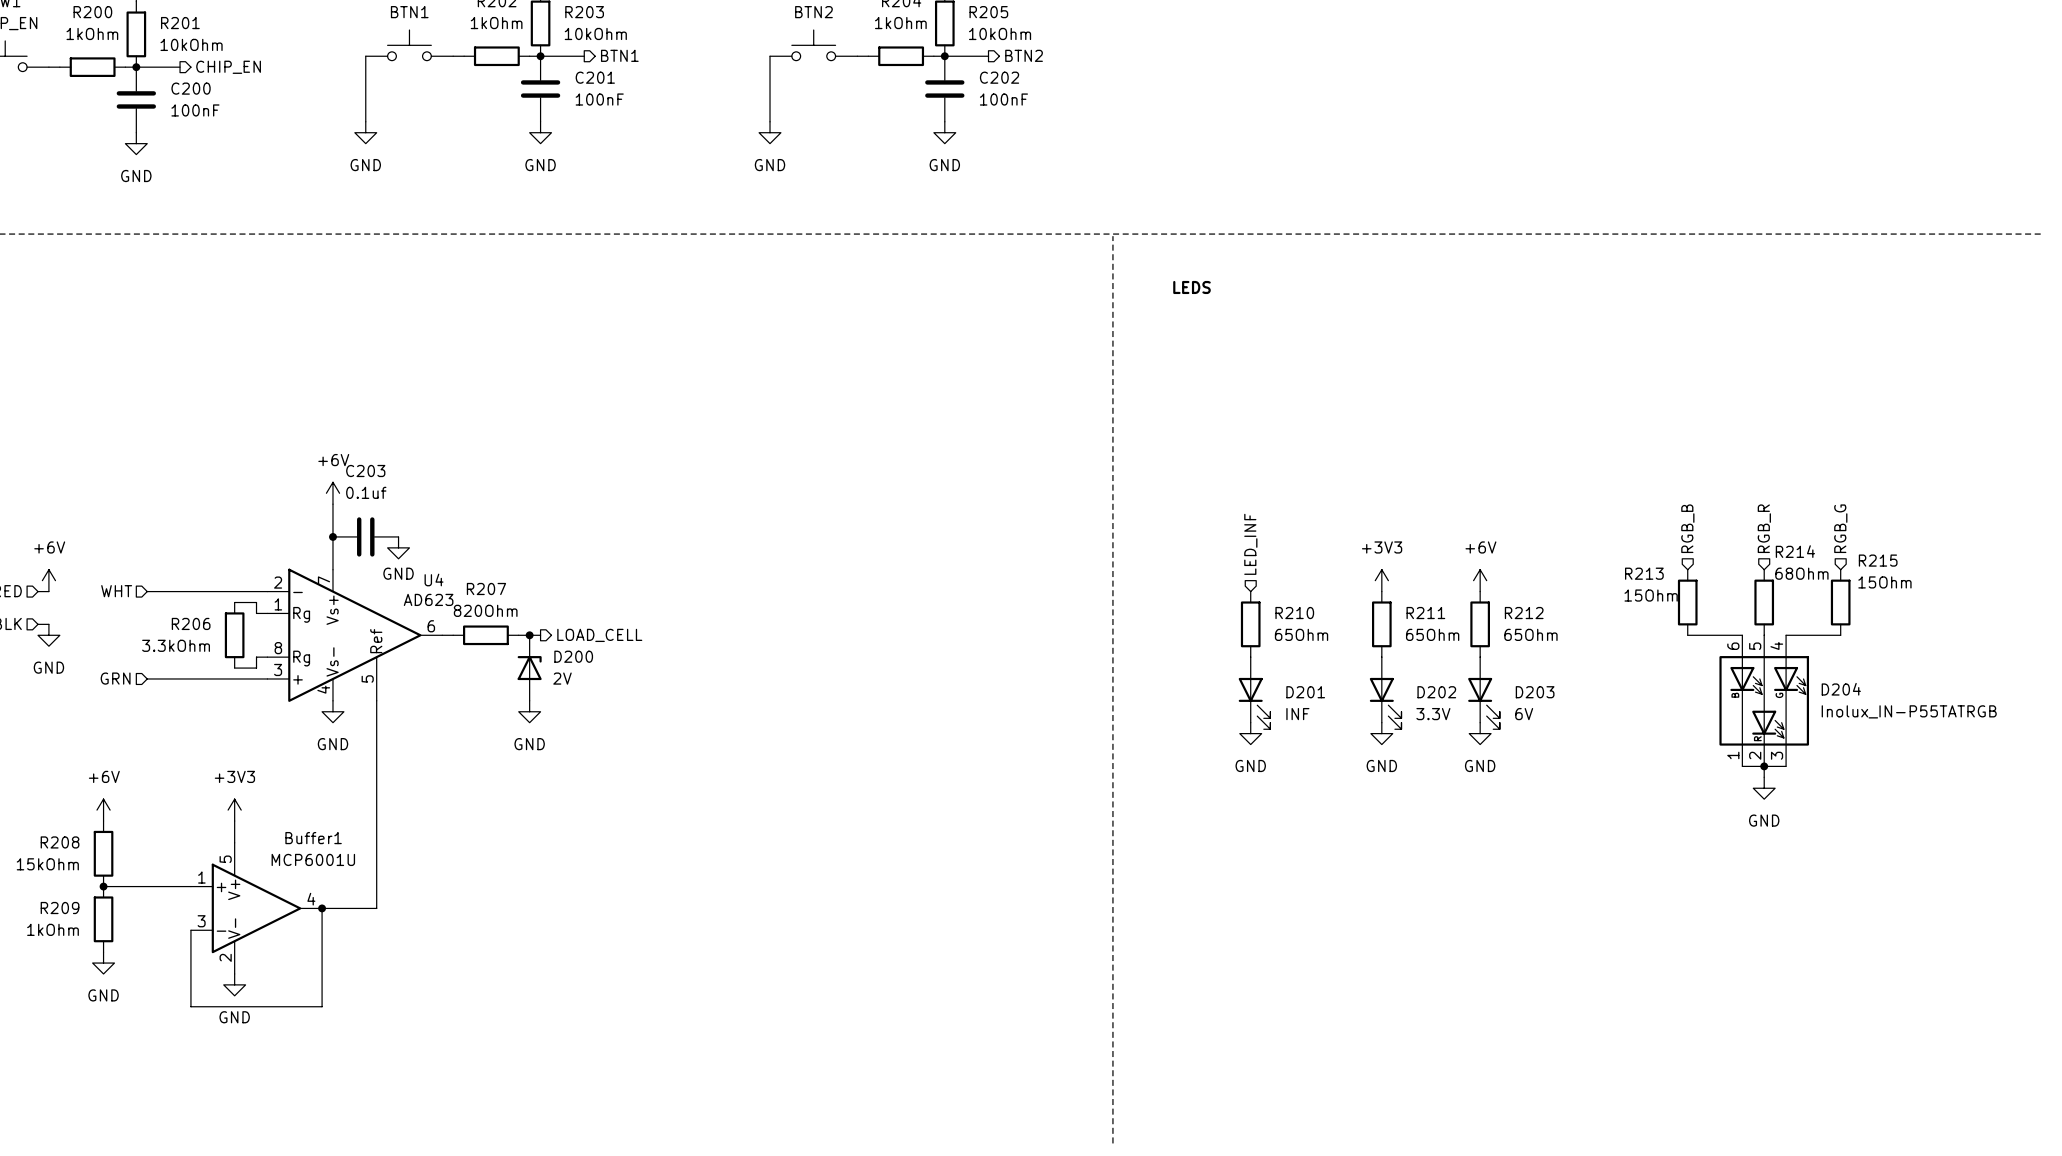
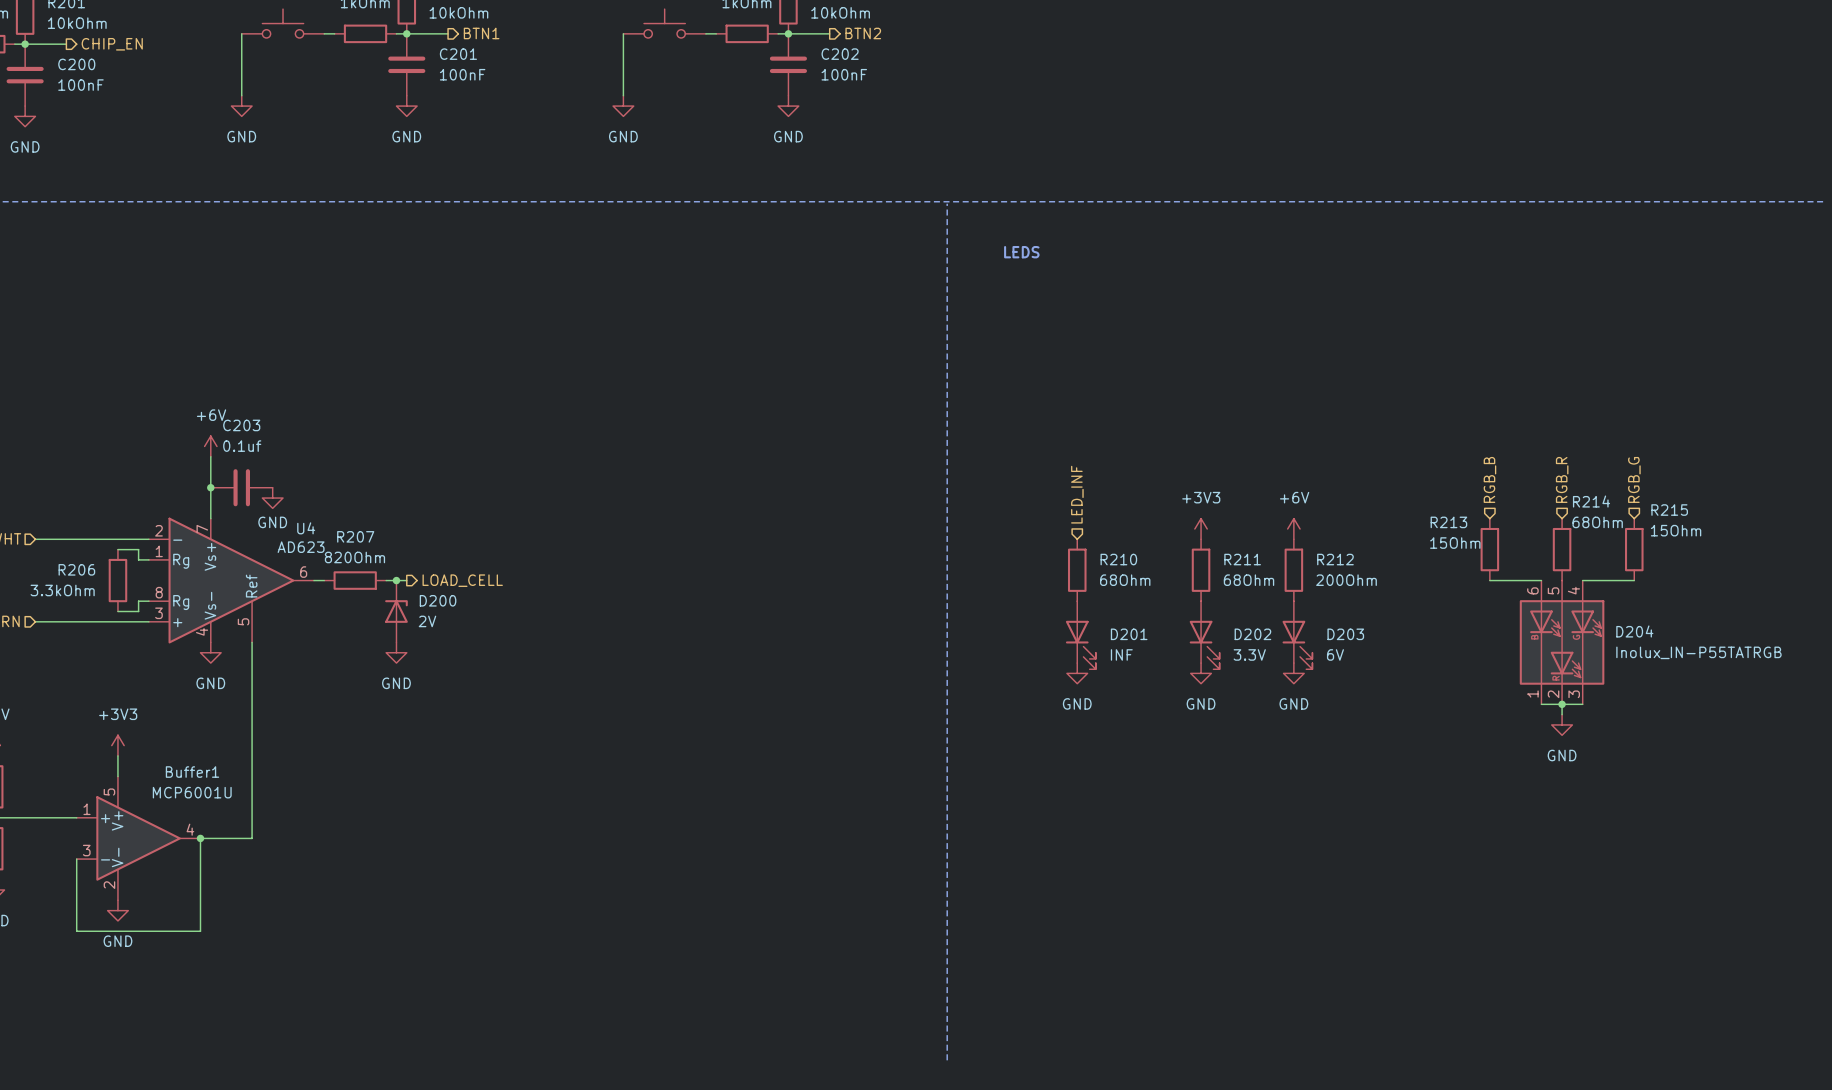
R210 value: 65Ohm (1301, 634) -> 68Ohm (1125, 580)
R211 value: 65Ohm (1432, 634) -> 68Ohm (1249, 580)
R212 value: 65Ohm (1530, 634) -> 200Ohm (1346, 580)

